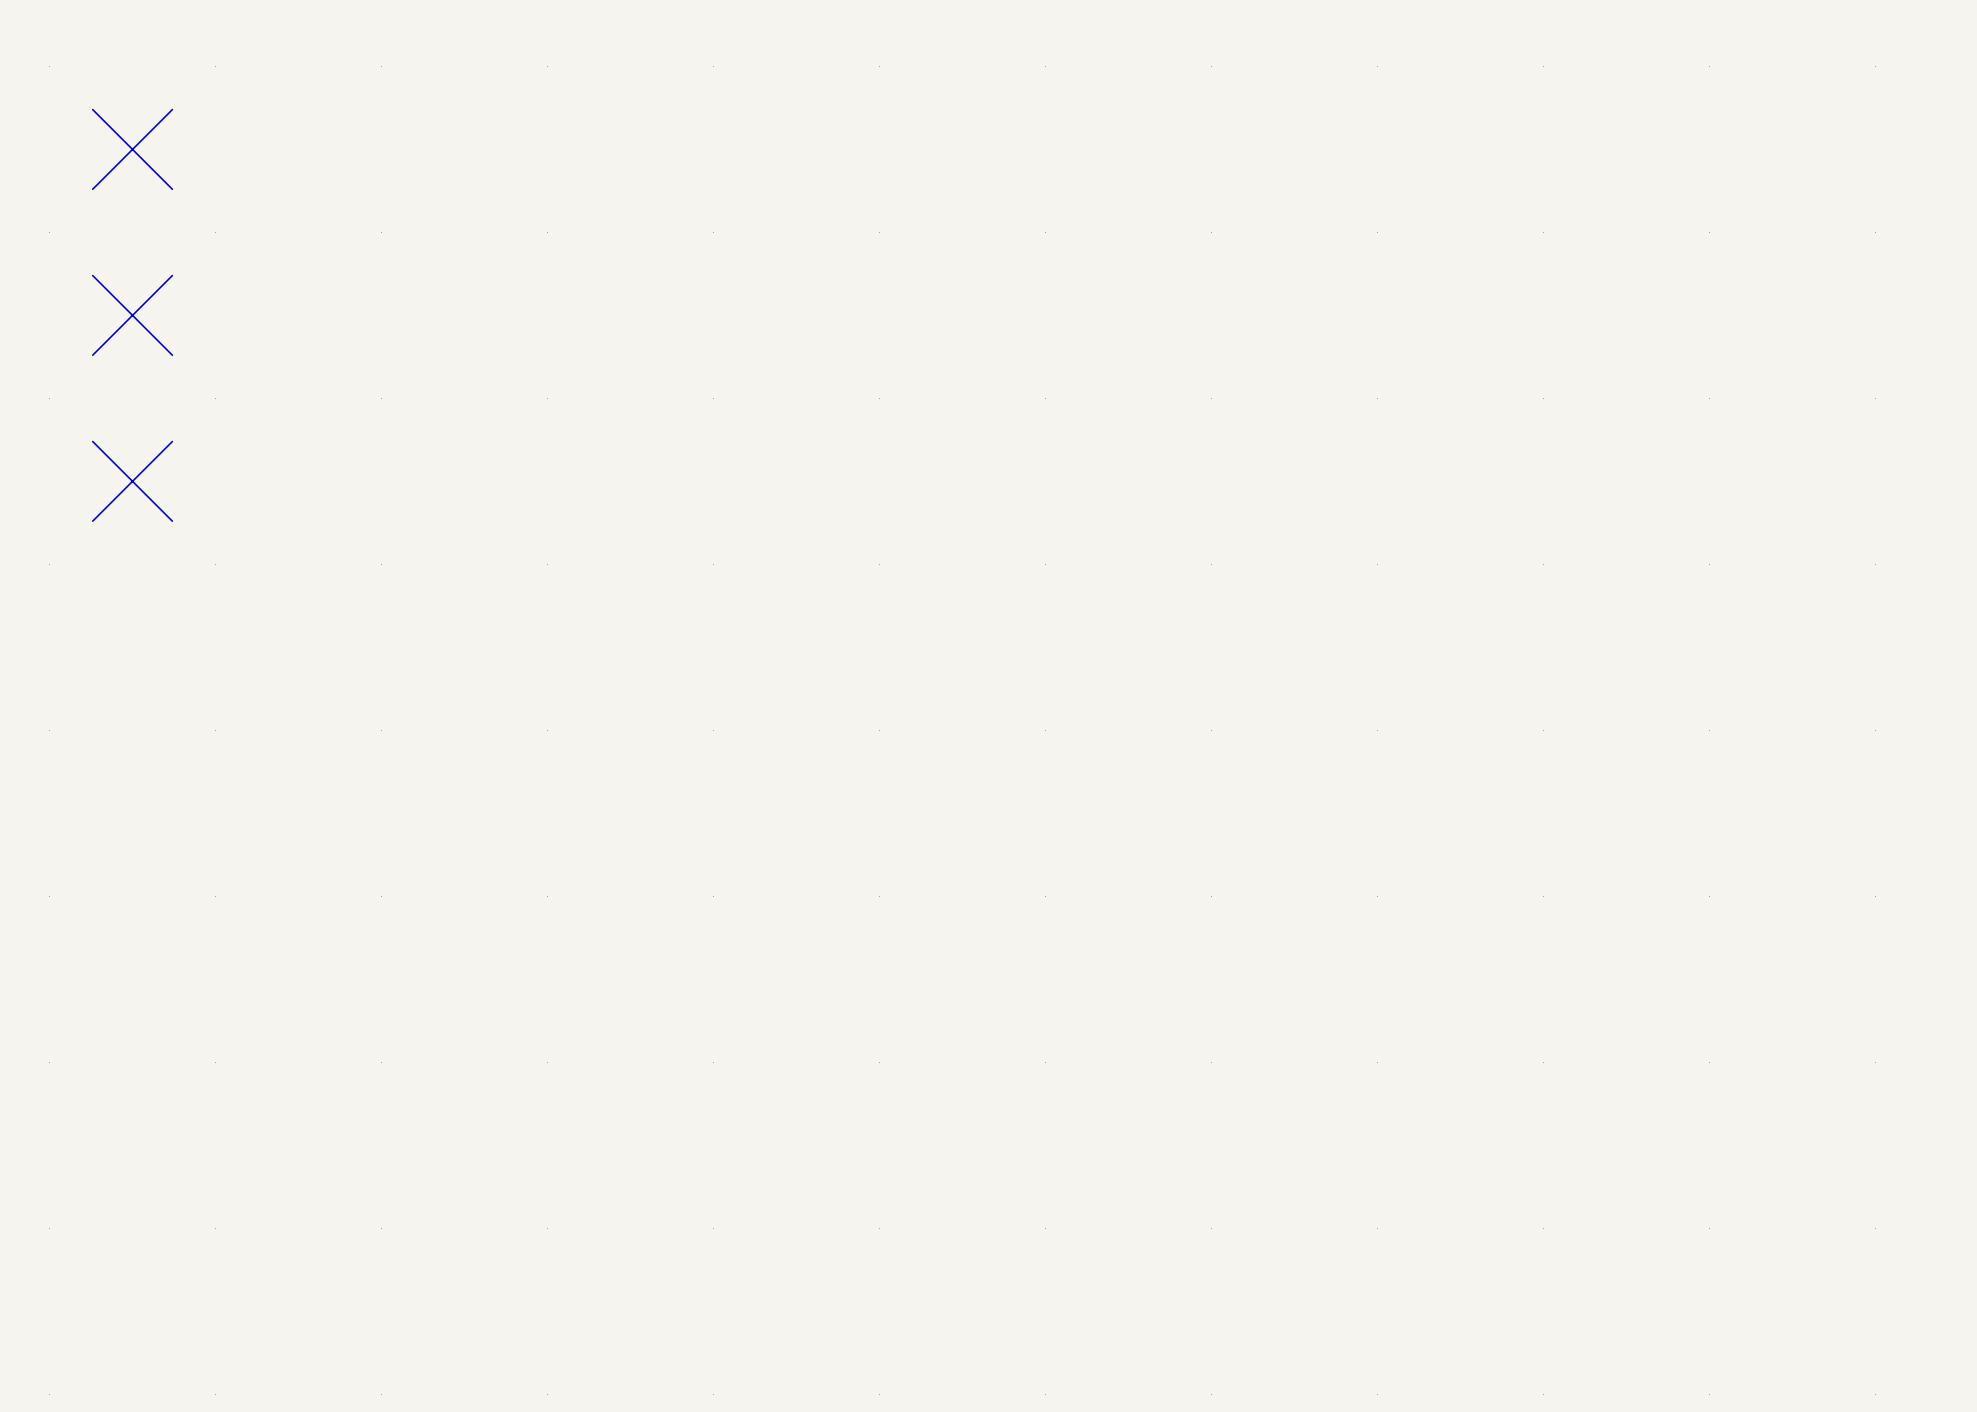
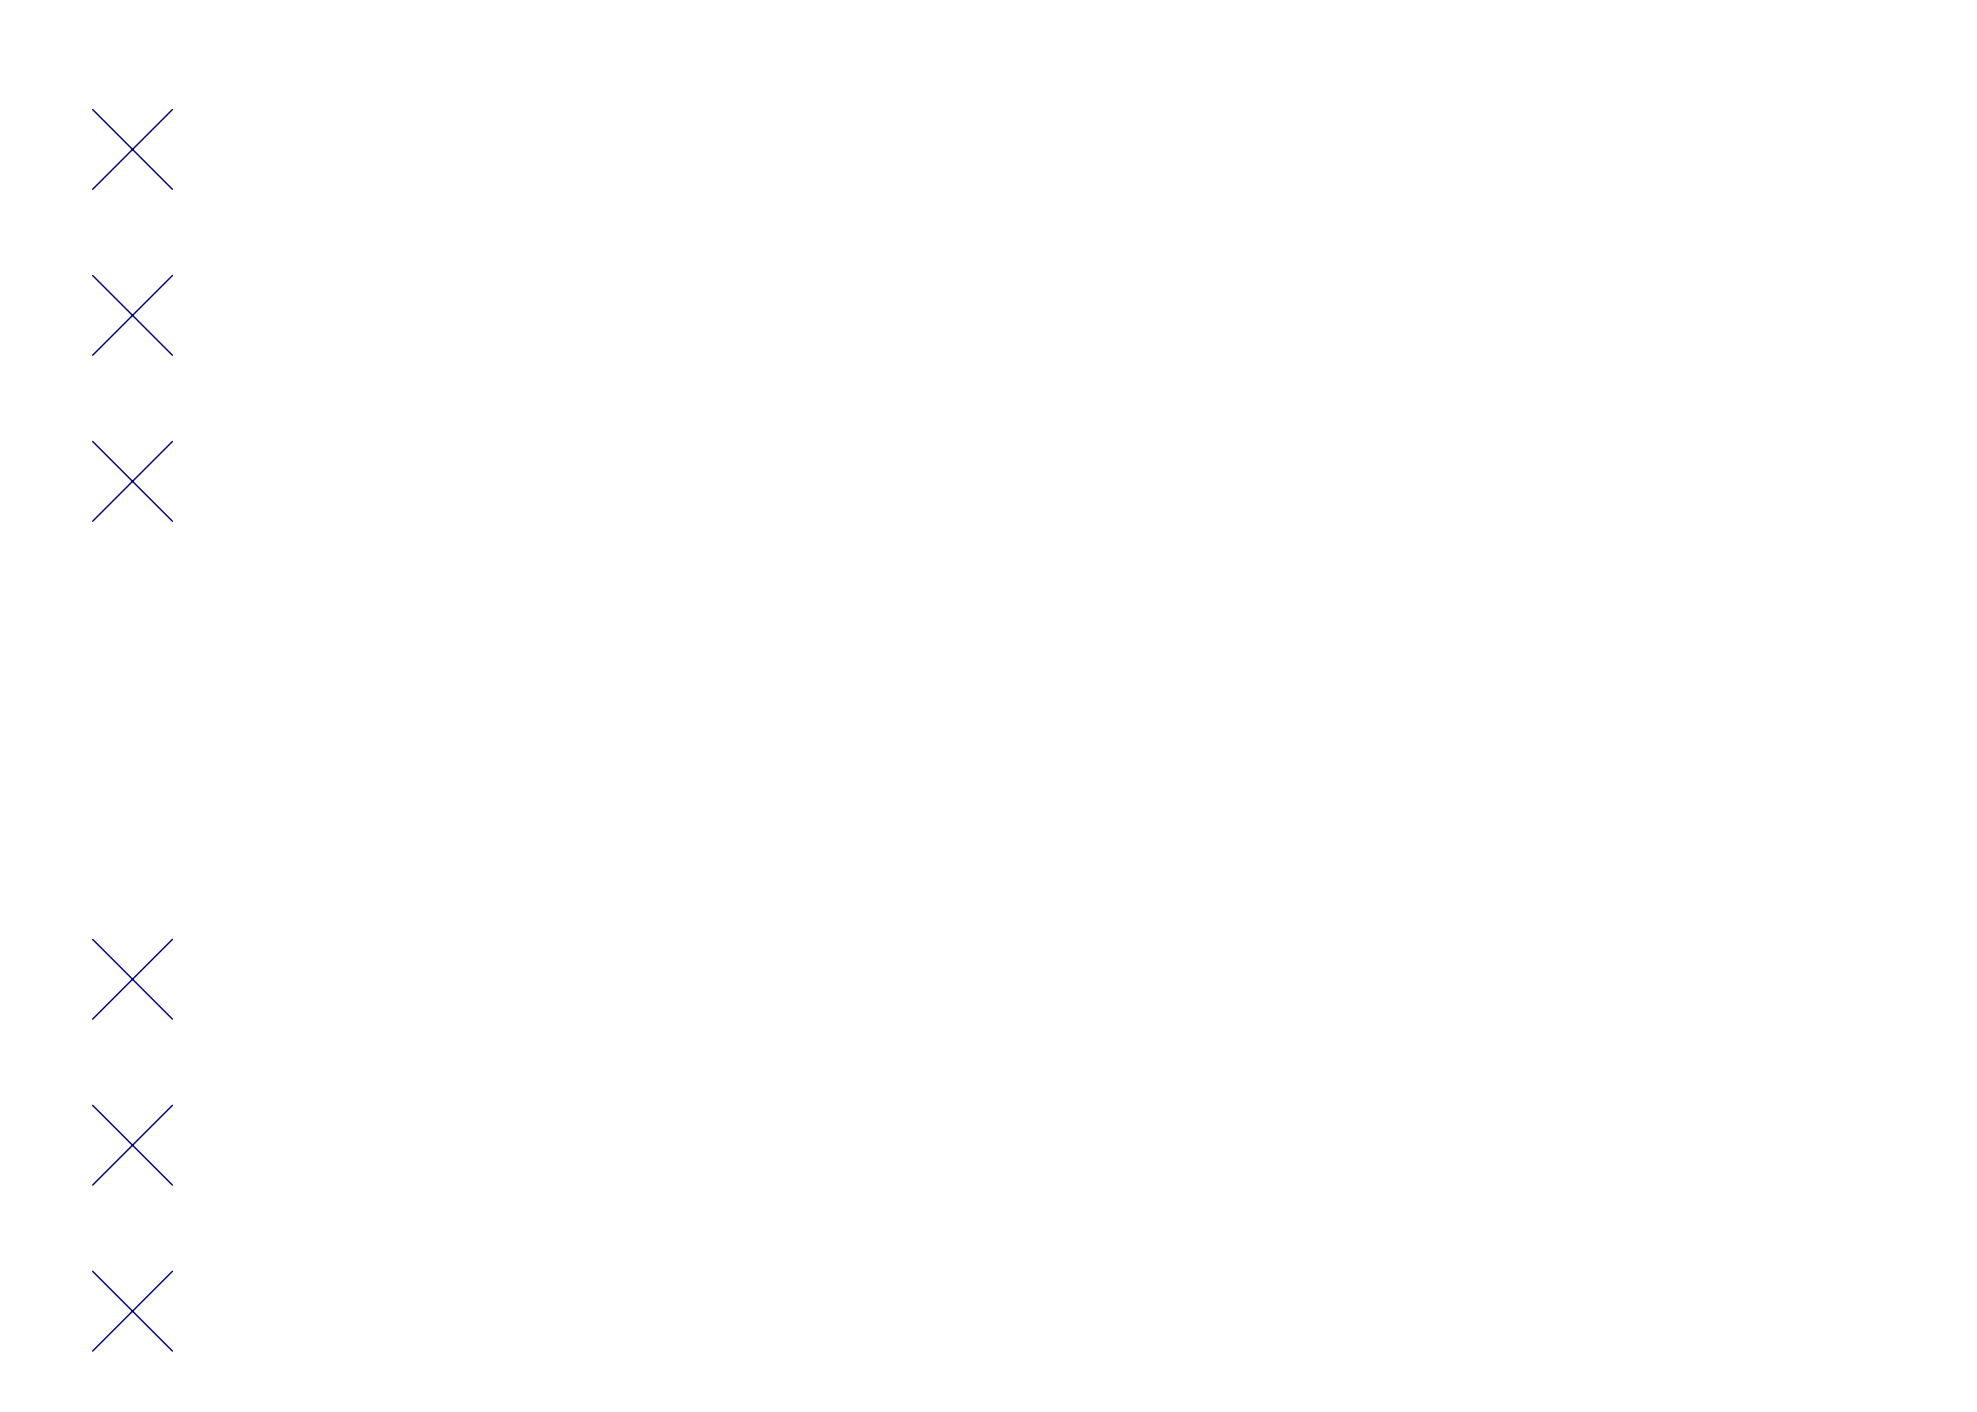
no-connect mark: none -> (132, 979)
no-connect mark: none -> (132, 1145)
no-connect mark: none -> (132, 1311)

